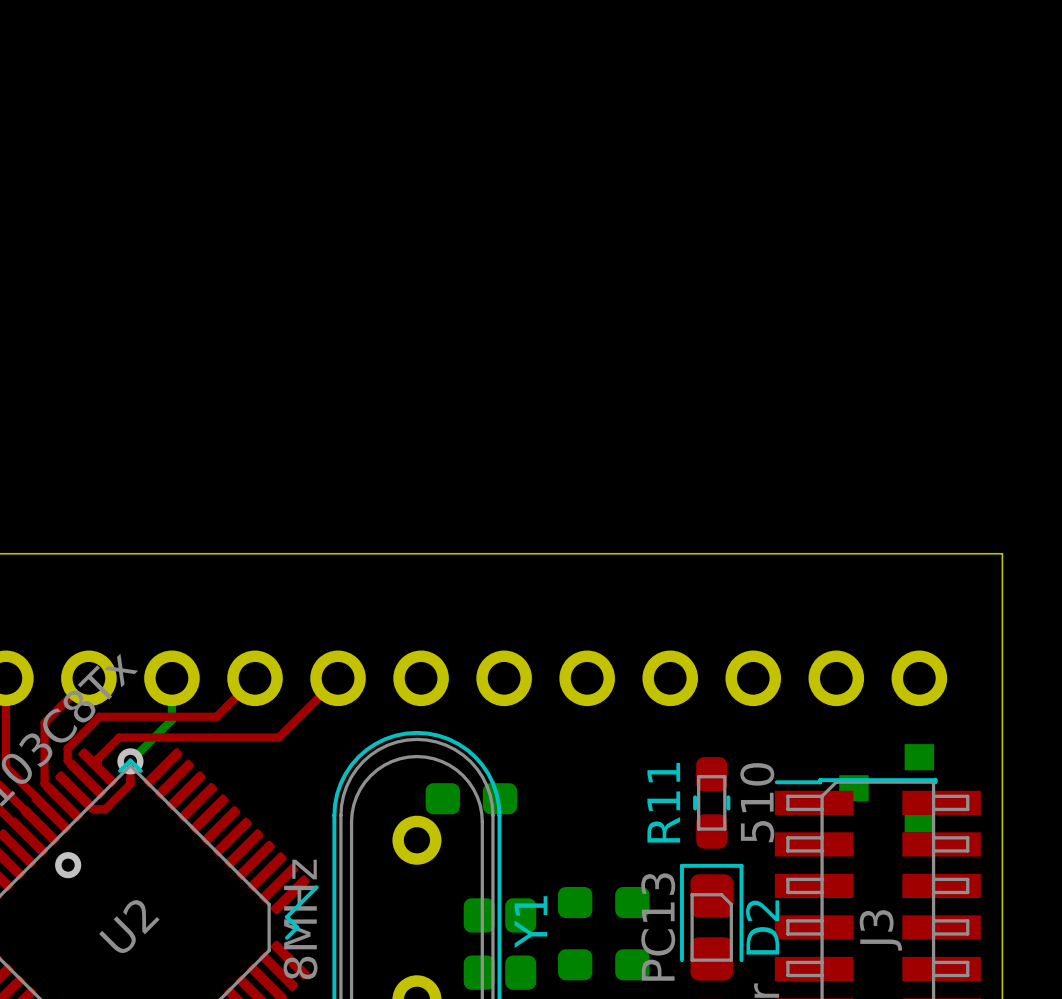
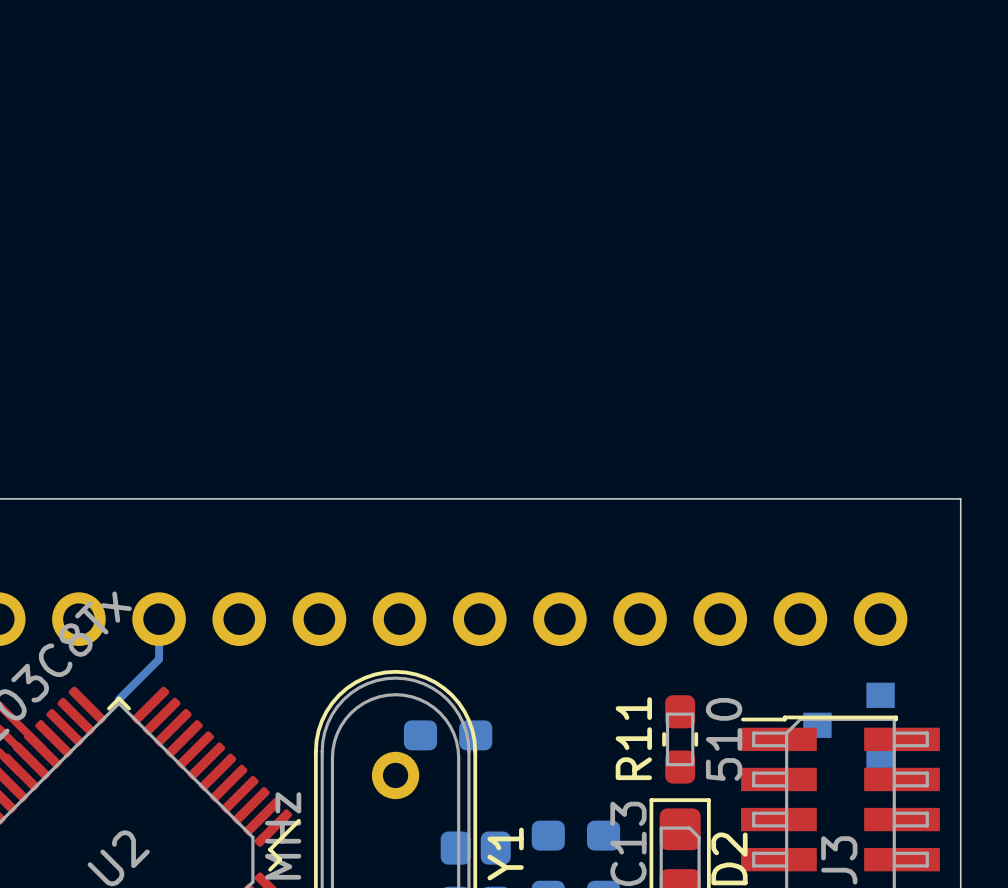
top track: (88, 678) (44, 722) (44, 783) (63, 802) -> none
top track: (255, 678) (216, 716) (99, 716) (67, 748) (67, 760) (86, 779) -> none
top track: (338, 678) (278, 737) (119, 737) (97, 758) (97, 767) -> none
top track: (130, 761) (130, 784) (105, 809) (93, 809) (74, 790) -> none
via: (130, 761) -> none
via: (68, 865) -> none

